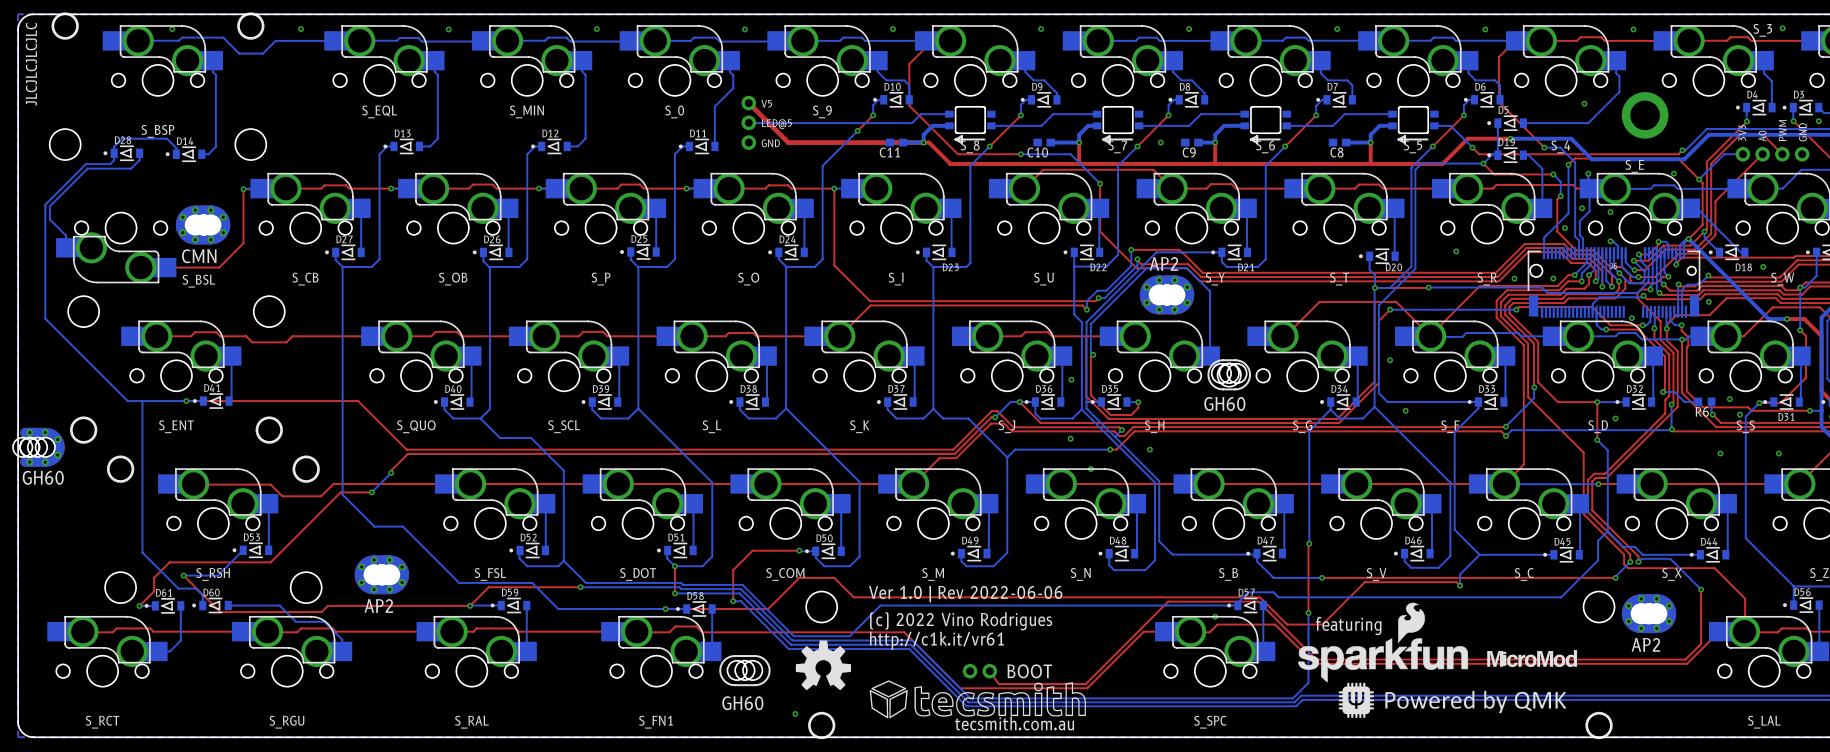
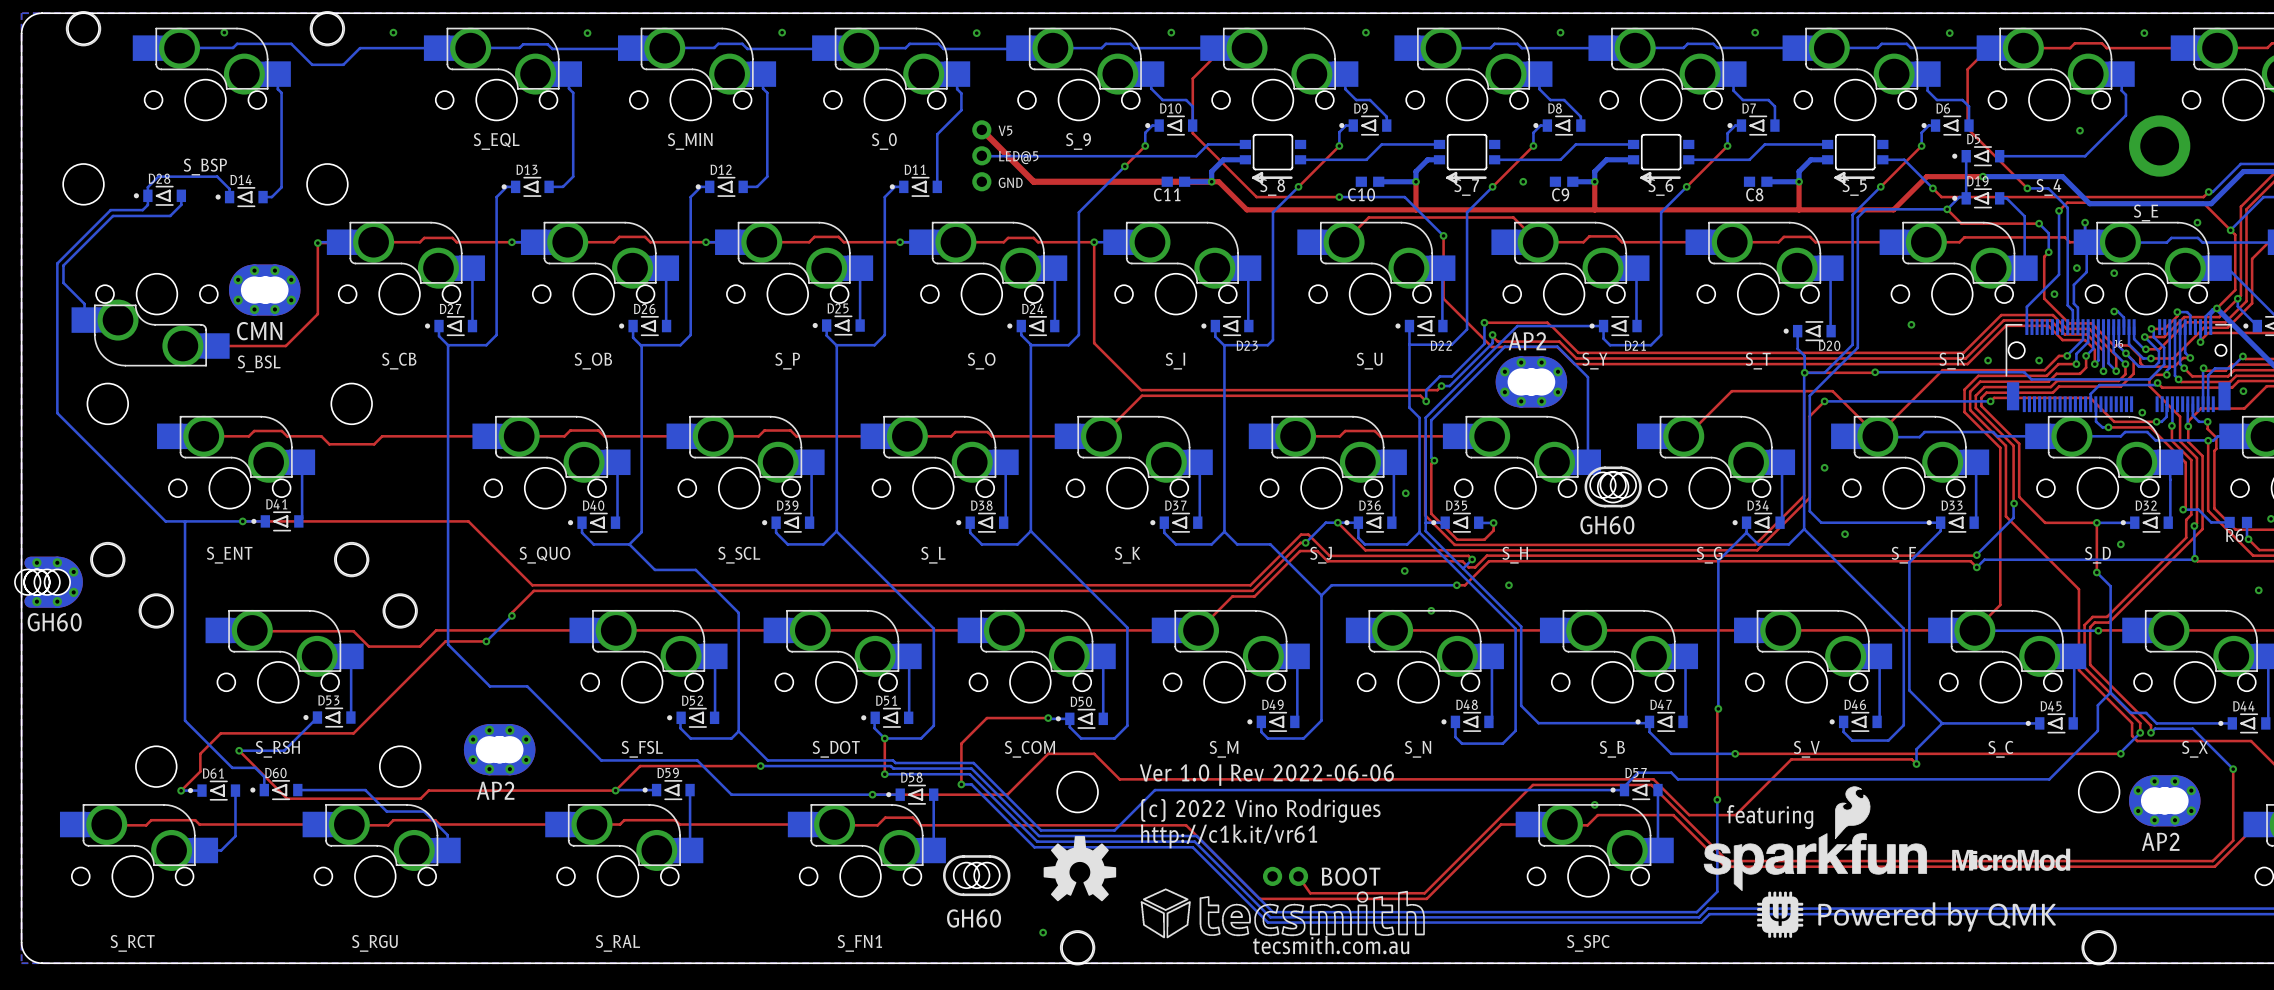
text: JLCJLCJLCJLC (31, 64) -> none

